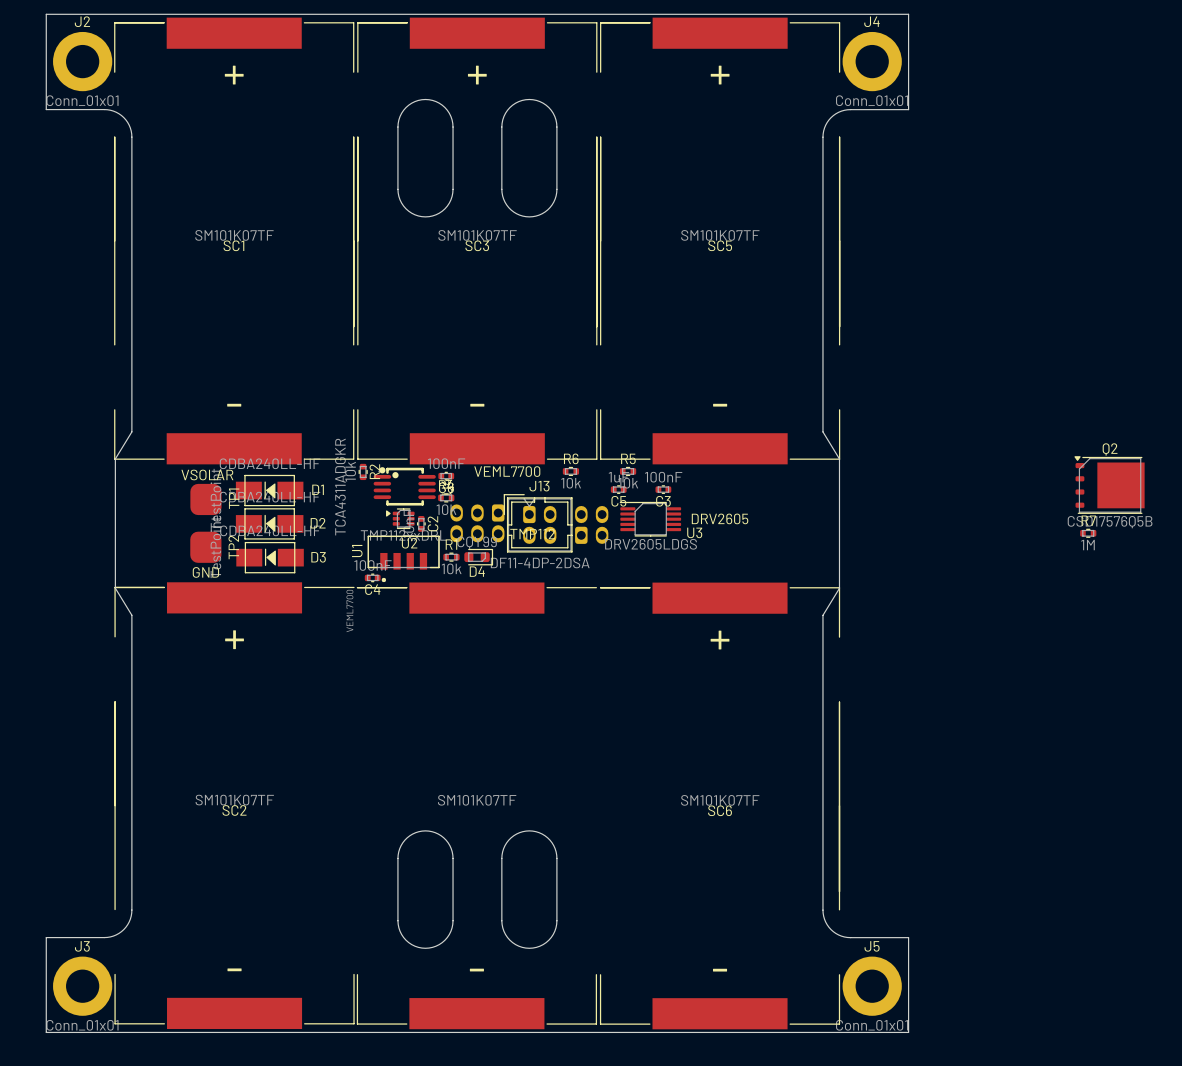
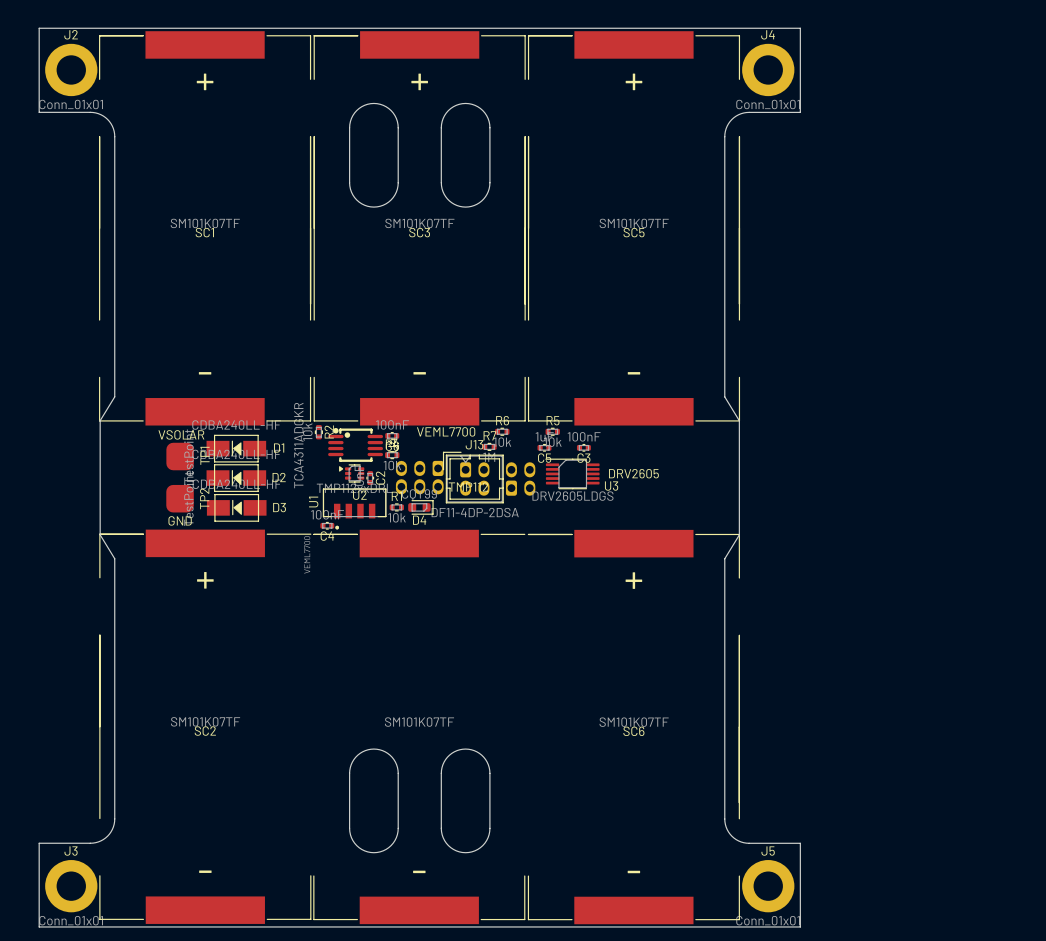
Q2: CSD17576Q5B (1109, 485) -> none
R7 position: (1088, 533) -> (489, 446)

